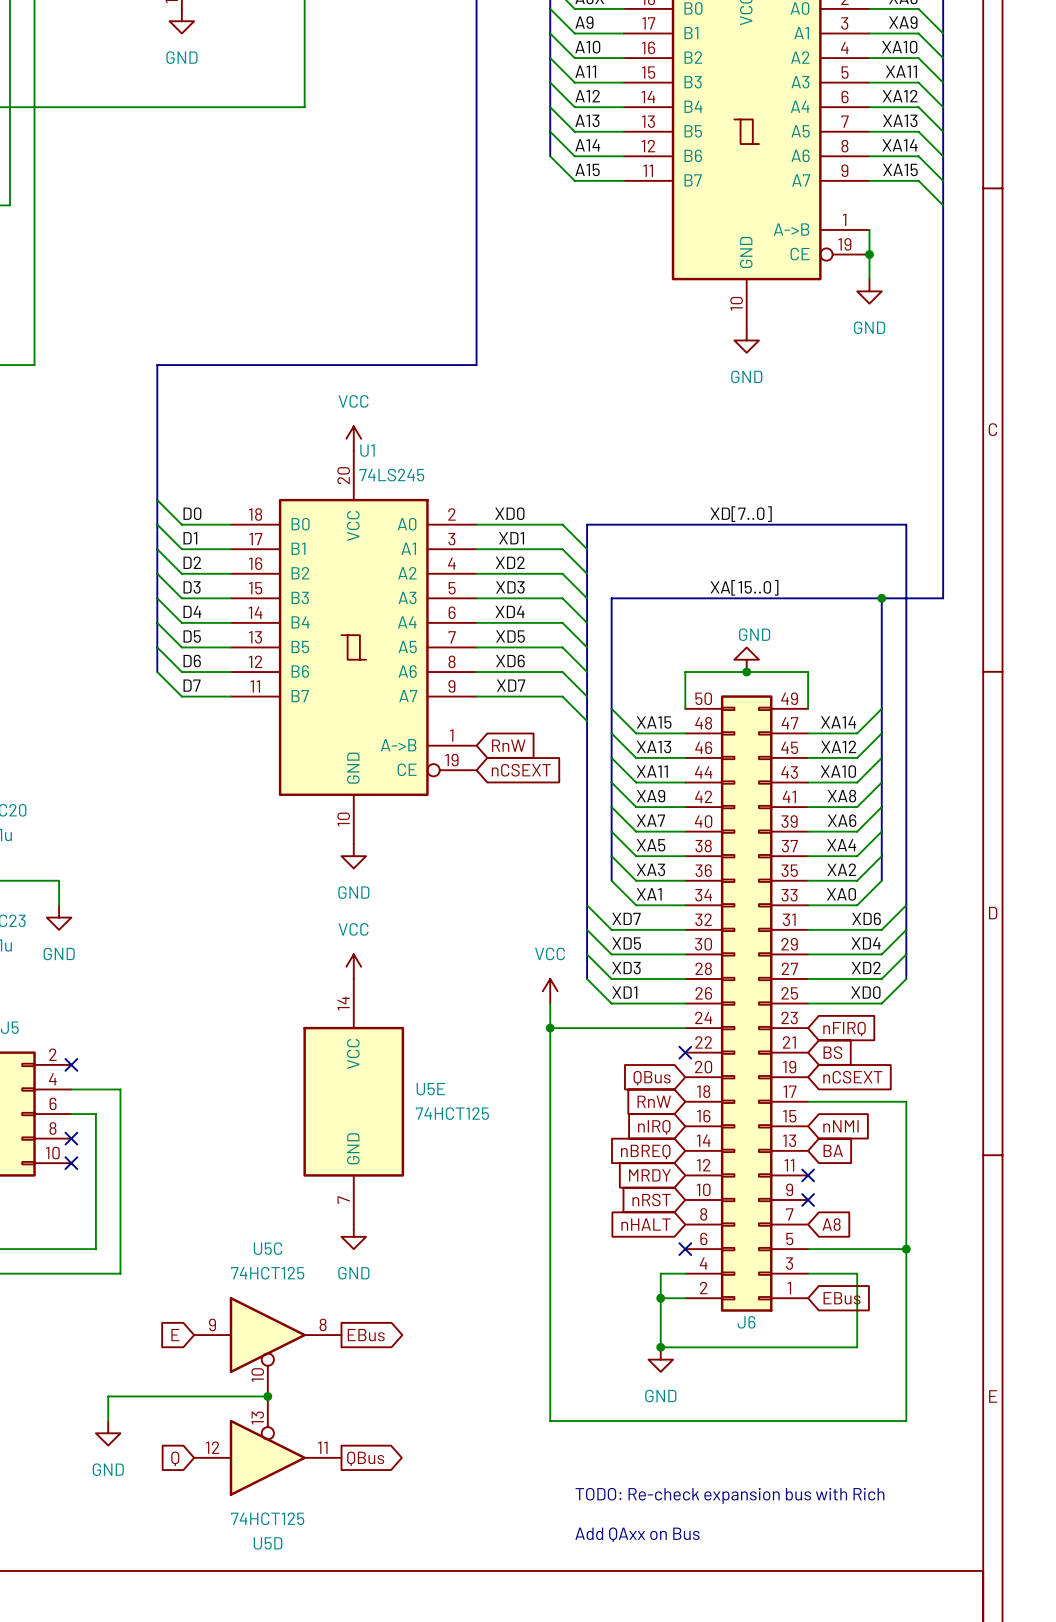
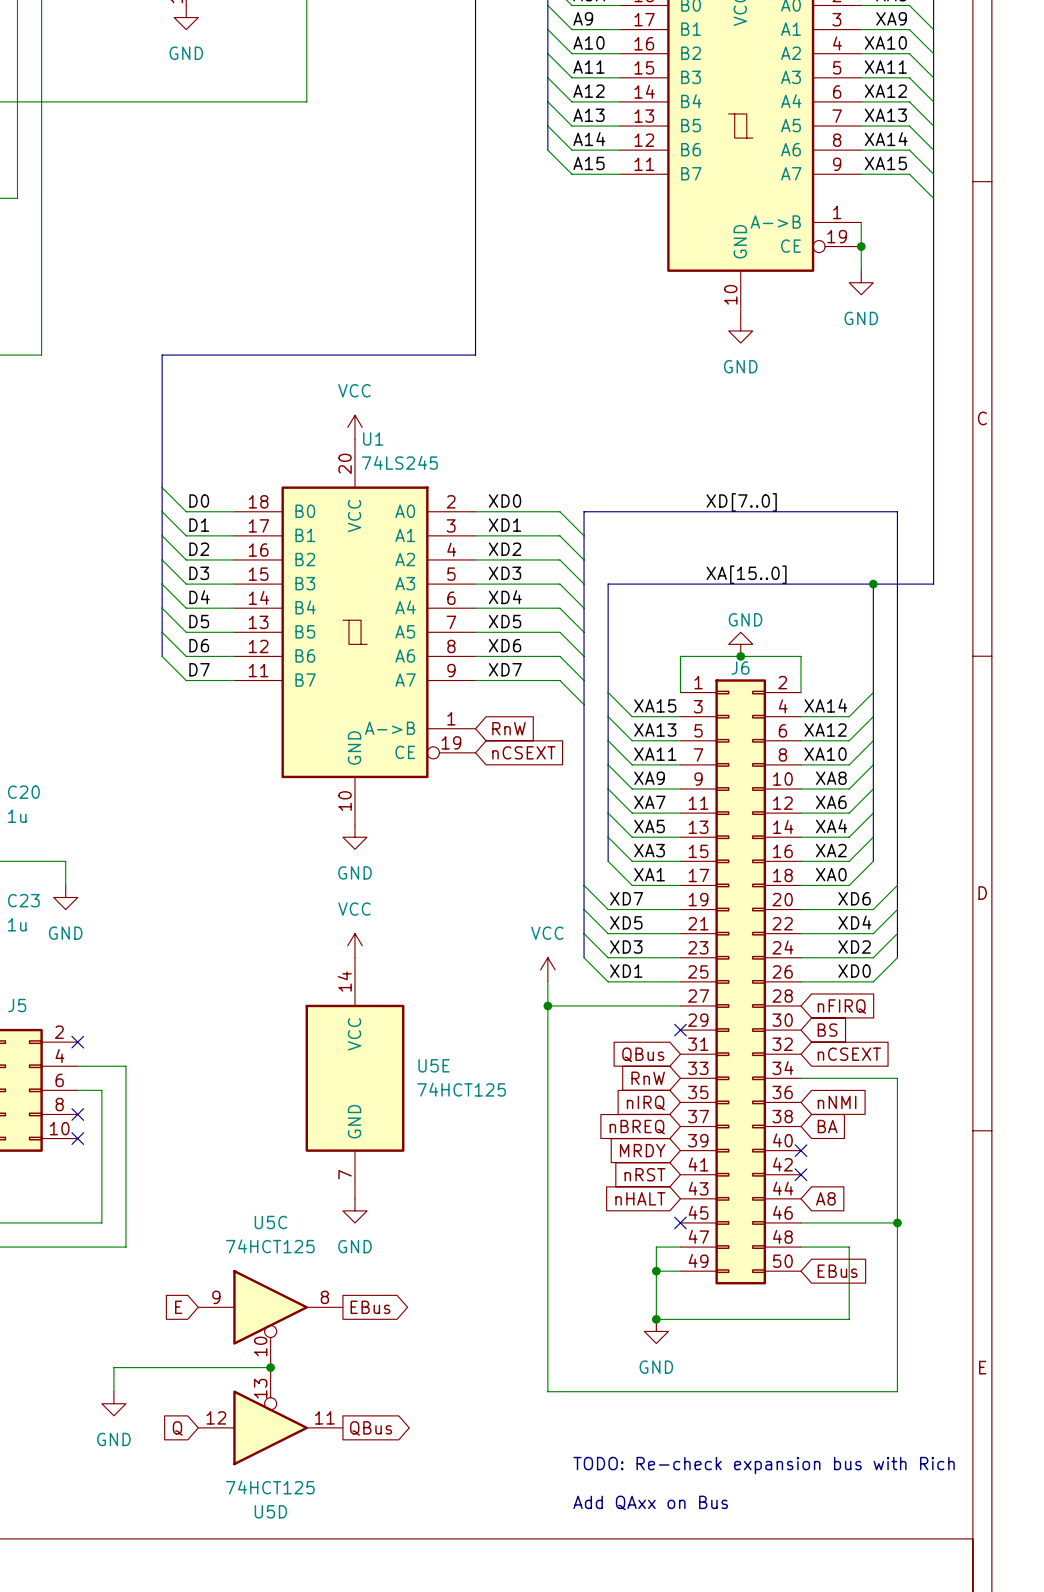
J6 rotation: 0° (746, 1003) -> 180° (740, 981)

